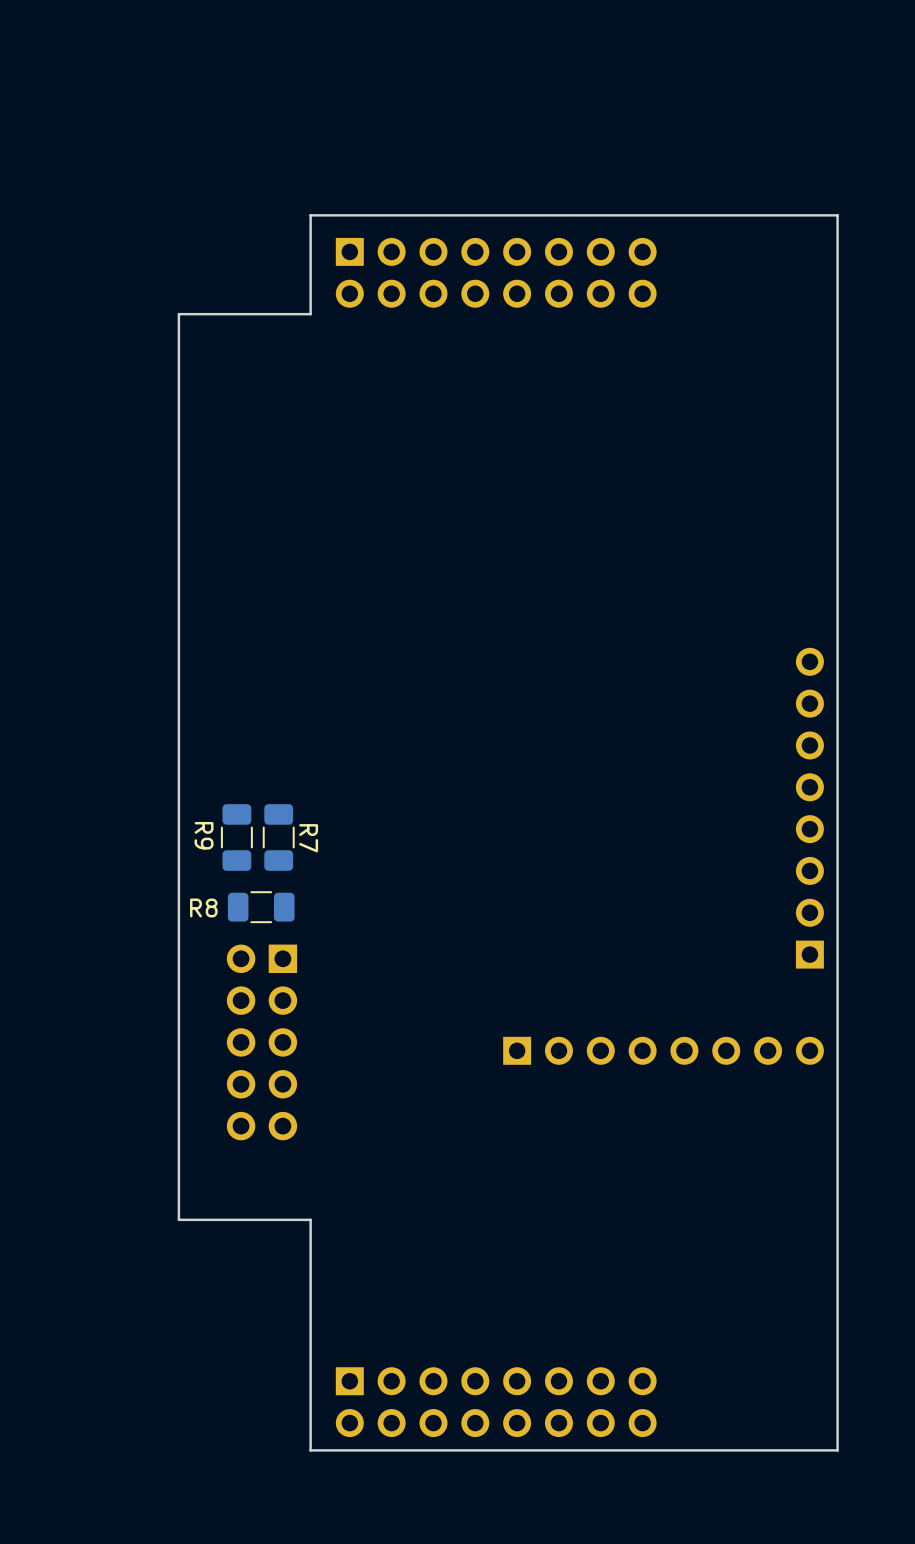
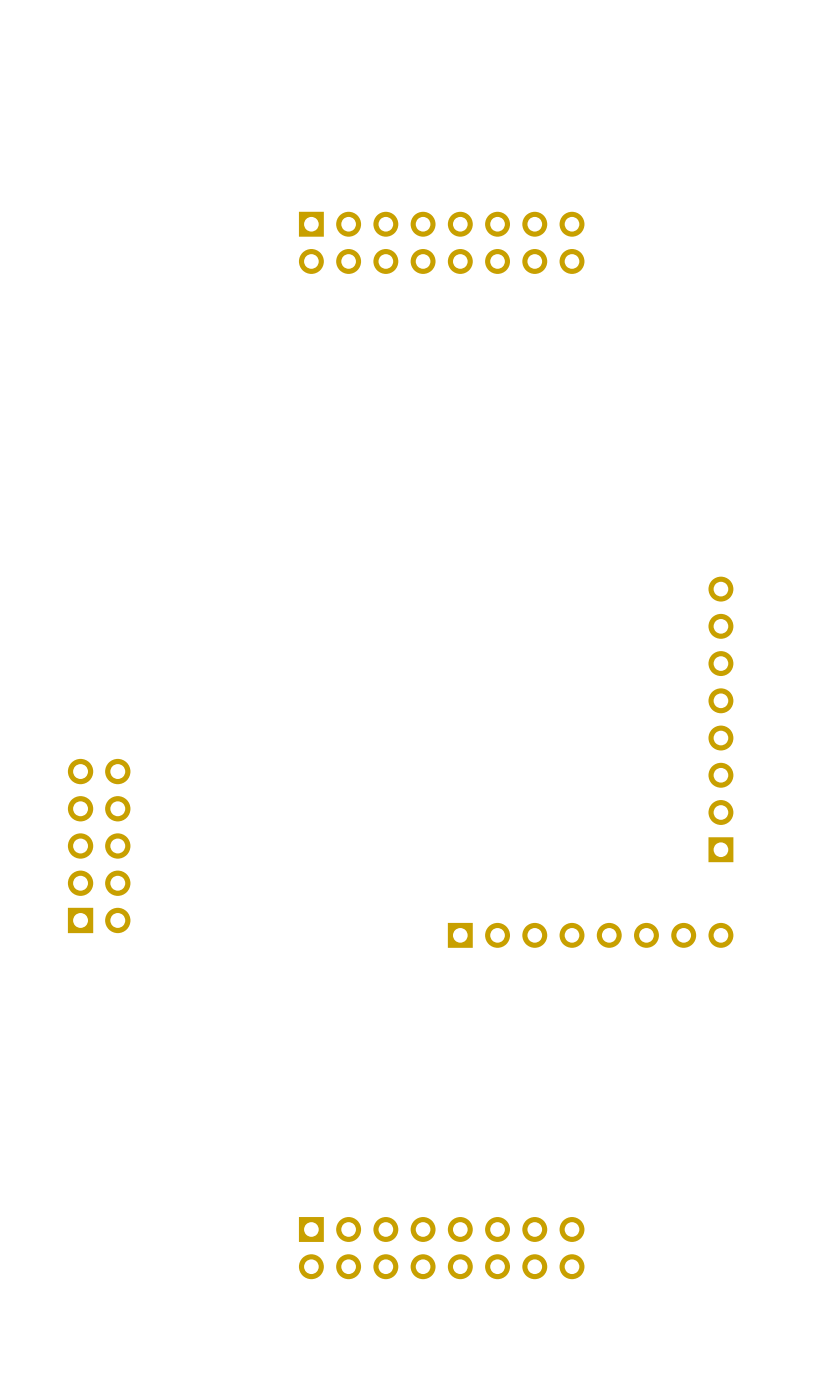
board edge: (837, 215) (310, 215) (310, 314) (178, 314) (178, 1219) (310, 1219) (310, 1450) (837, 1450) (837, 215) -> none
R9: (236, 837) -> none
R7: (278, 837) -> none
R8: (261, 907) -> none
part rotation: 0° (261, 1042) -> 180° (99, 846)
part position: (261, 1042) -> (99, 846)

